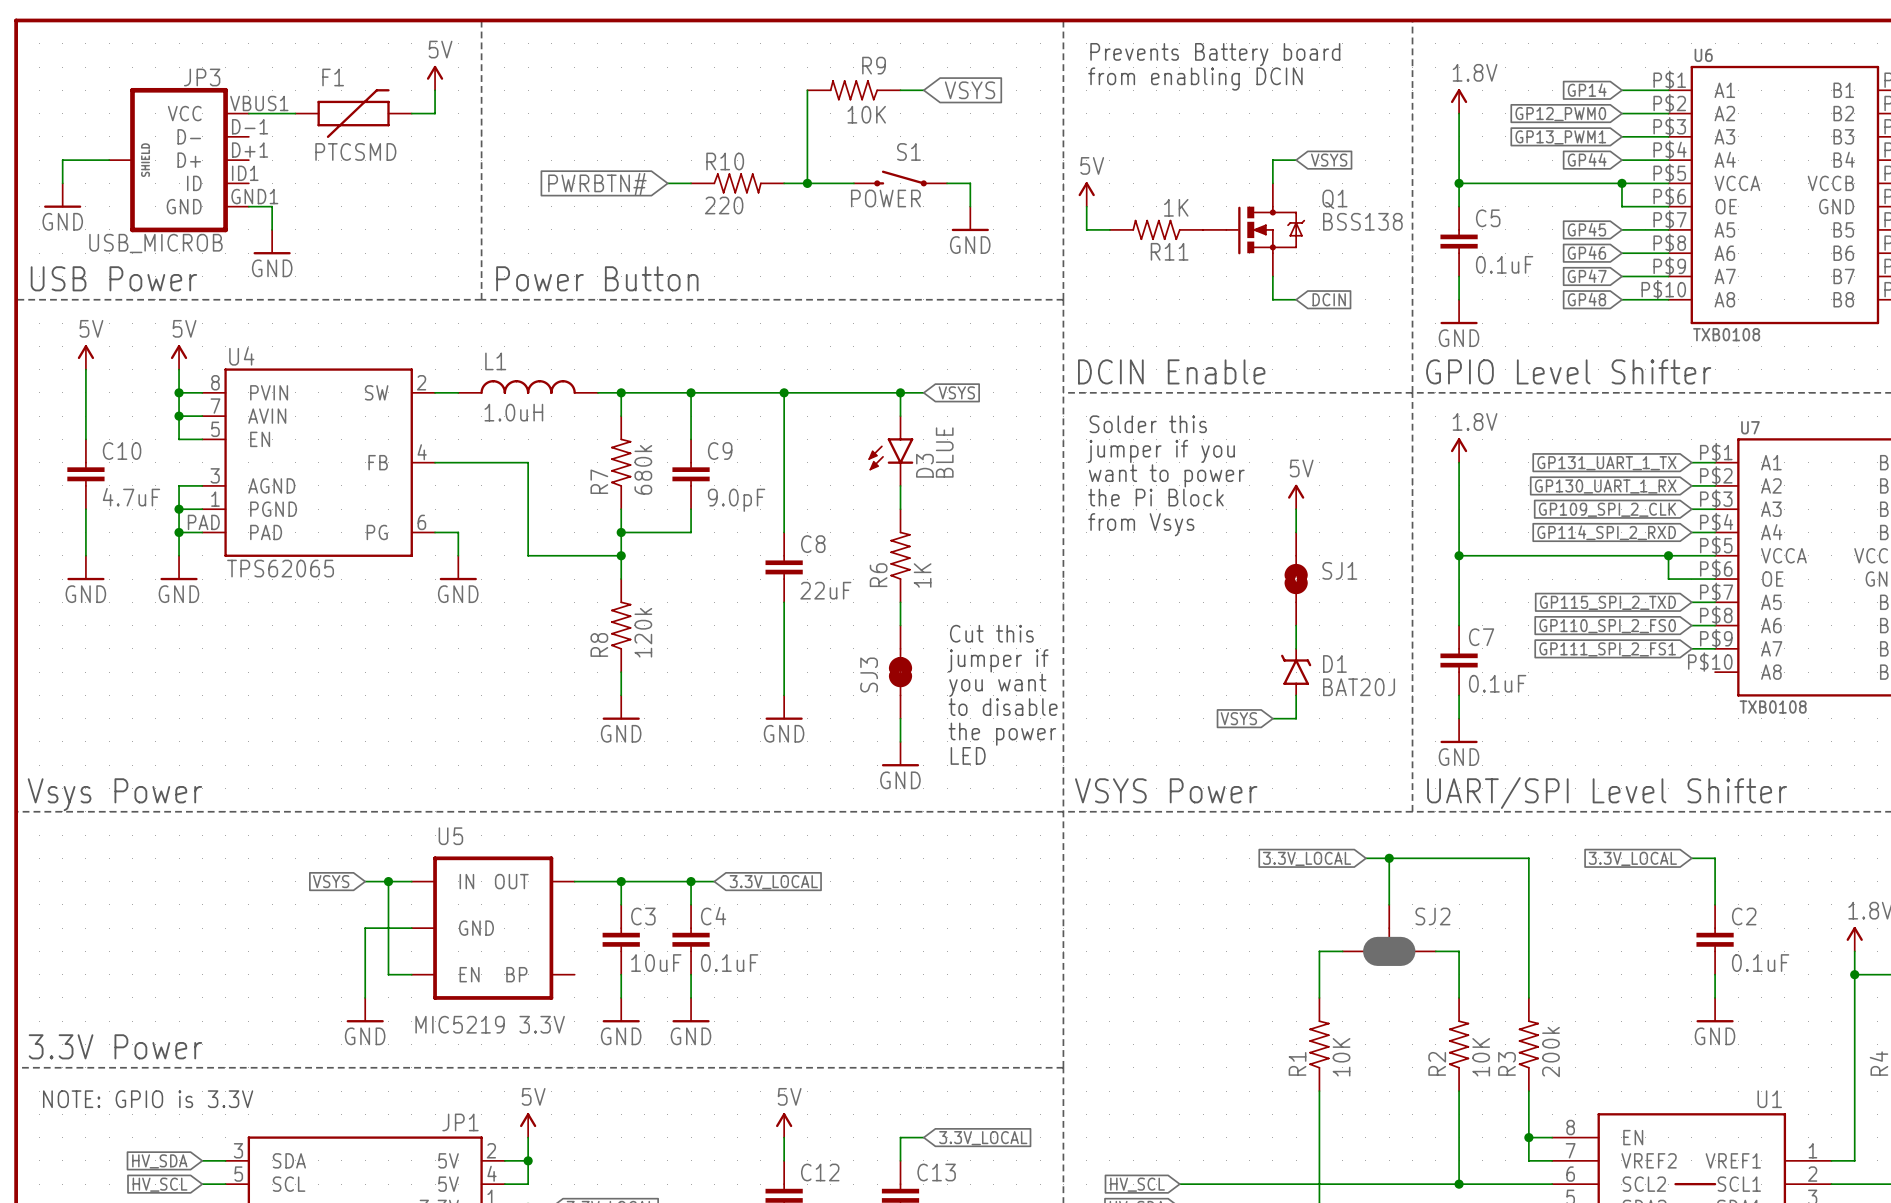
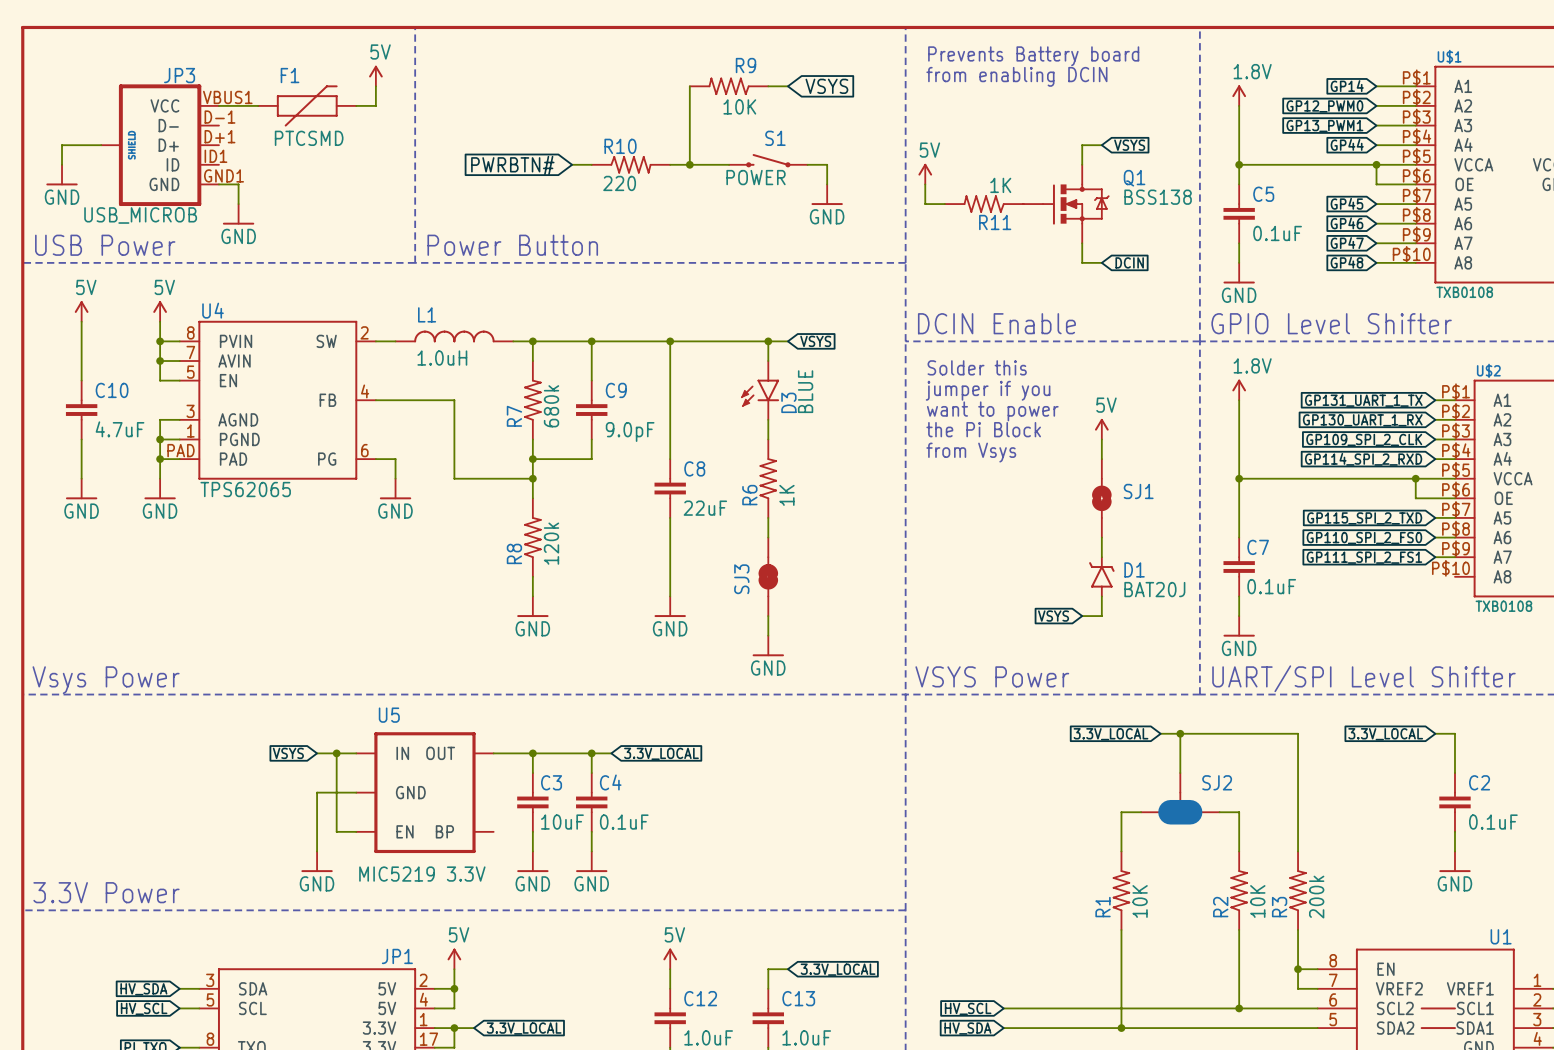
U6 name: U6 (1703, 55) -> U$1 (1449, 56)
U7 name: U7 (1750, 427) -> U$2 (1488, 370)
text: Cut this (991, 633) -> none
text: jumper if (998, 660) -> none
text: you want (997, 685) -> none
text: to disable (1003, 707) -> none
text: the power (1002, 734) -> none
text: LED (968, 755) -> none
text: NOTE: GPIO is 3.3V (148, 1099) -> none

